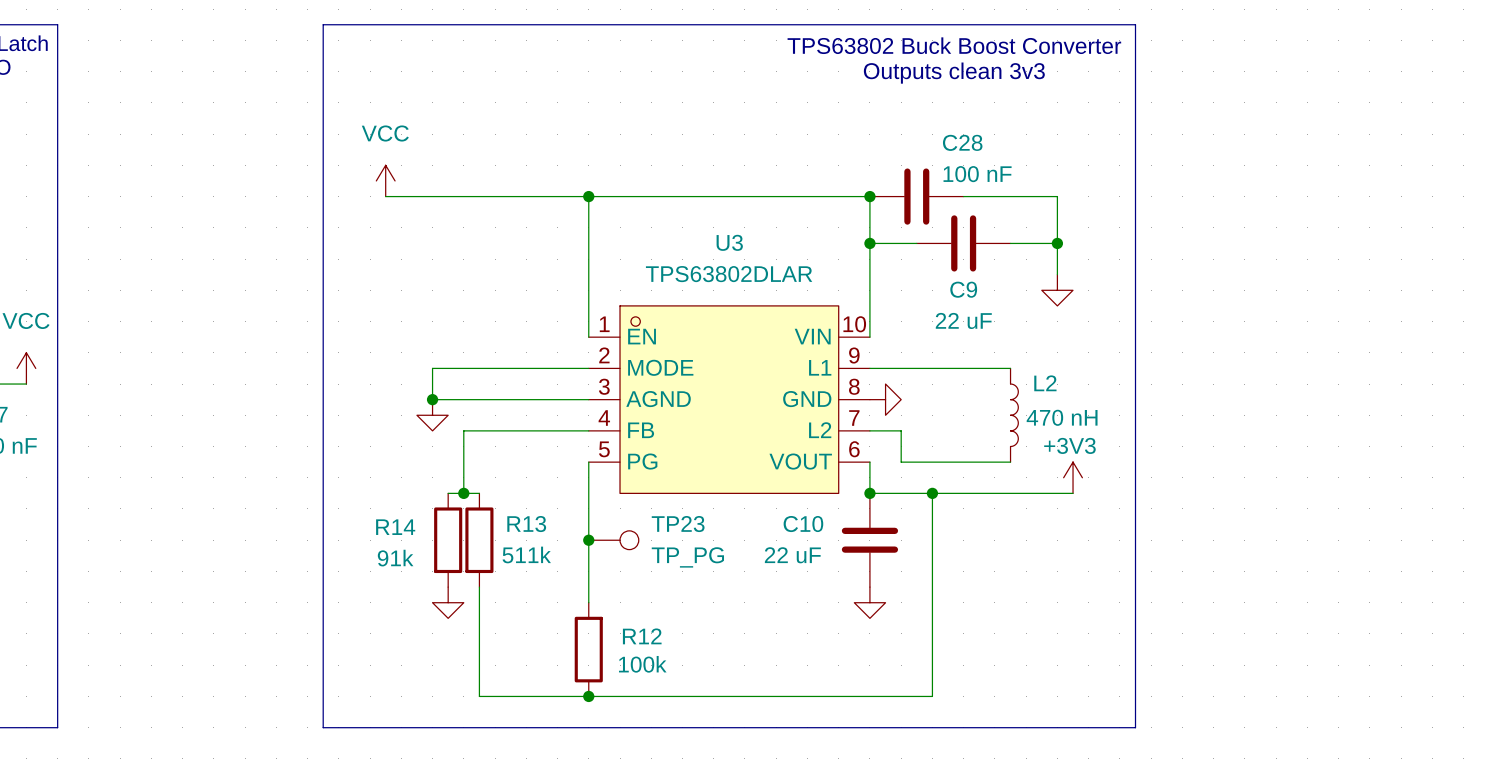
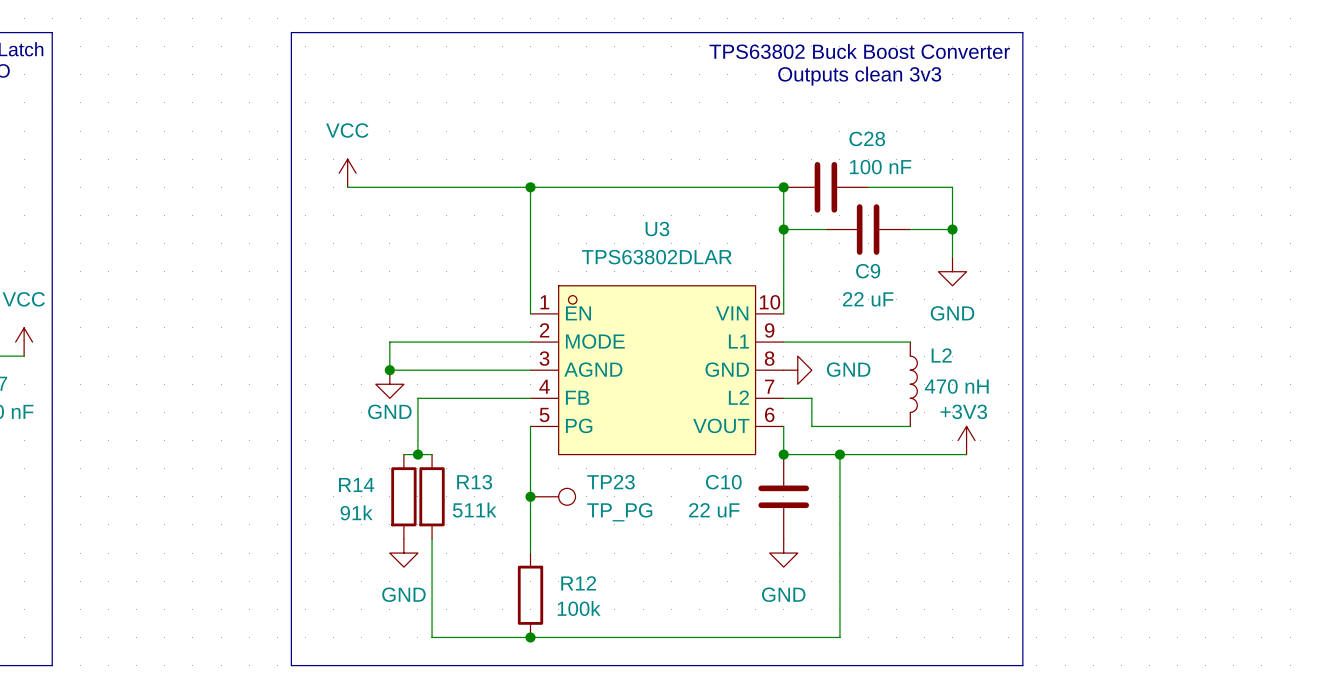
power symbol text: none -> GND (952, 313)
power symbol text: none -> GND (848, 369)
power symbol text: none -> GND (389, 411)
power symbol text: none -> GND (403, 594)
power symbol text: none -> GND (783, 594)

